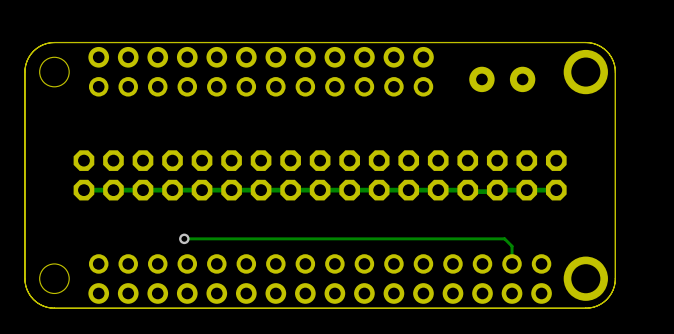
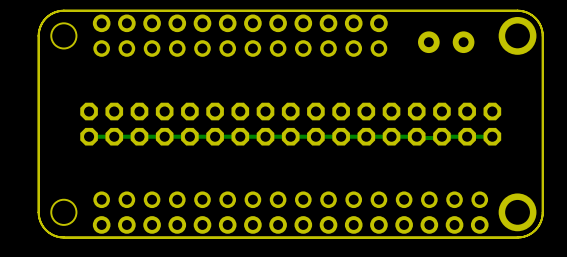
track: (184, 238) (504, 238) (512, 246) (512, 263) -> none
via: (184, 238) -> none

